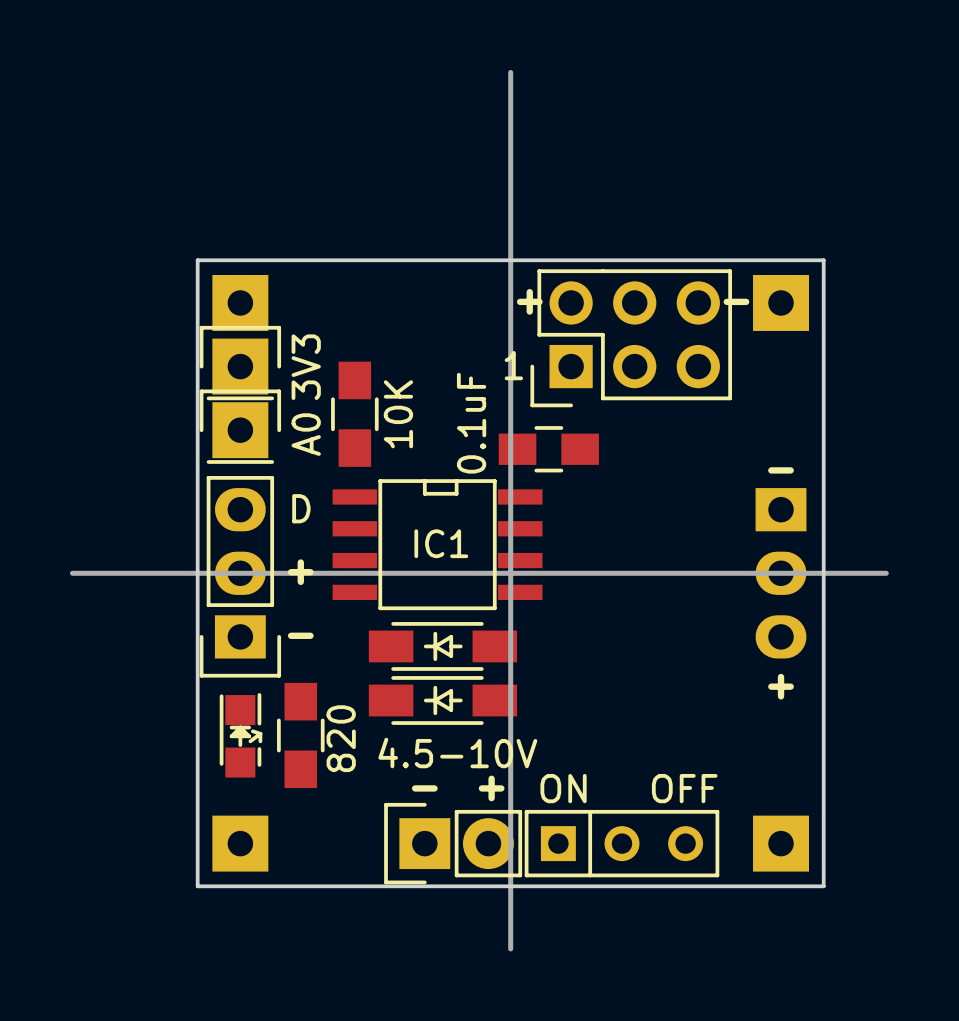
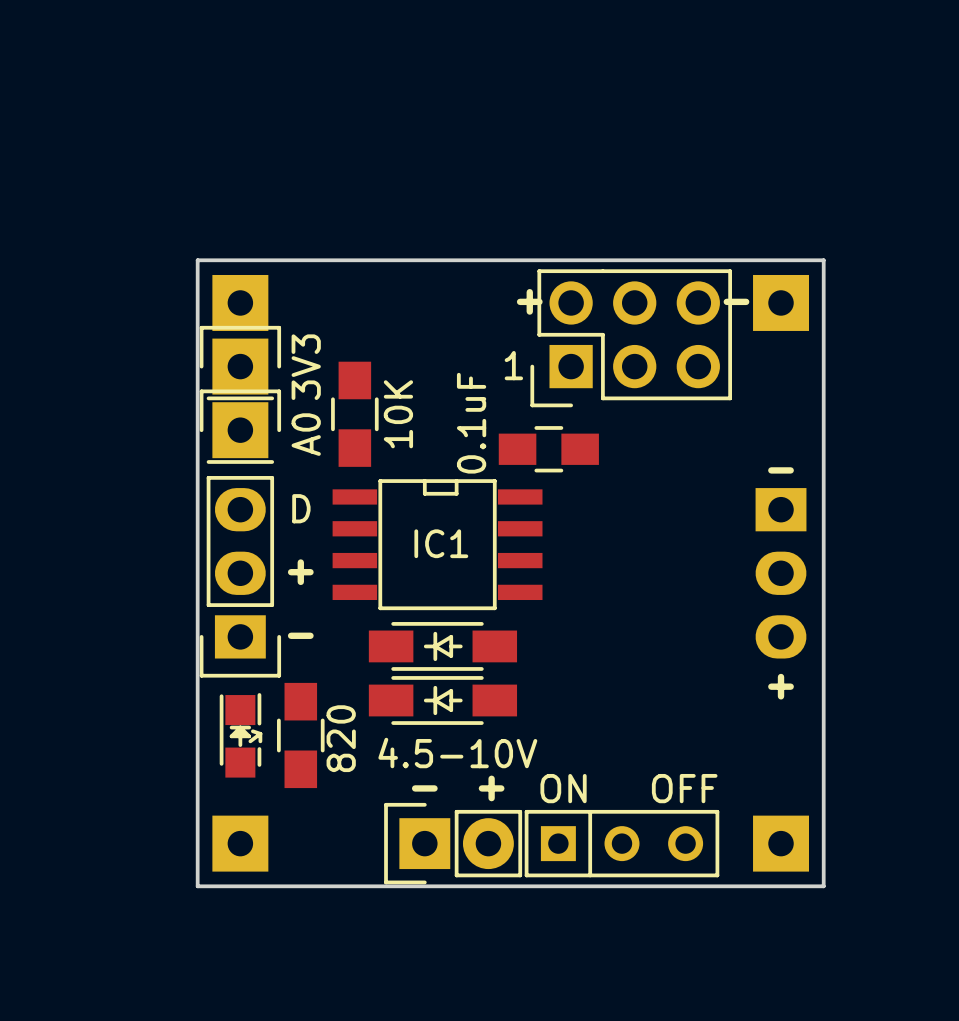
line: (510, 72) (510, 948) -> none
line: (72, 573) (886, 573) -> none

